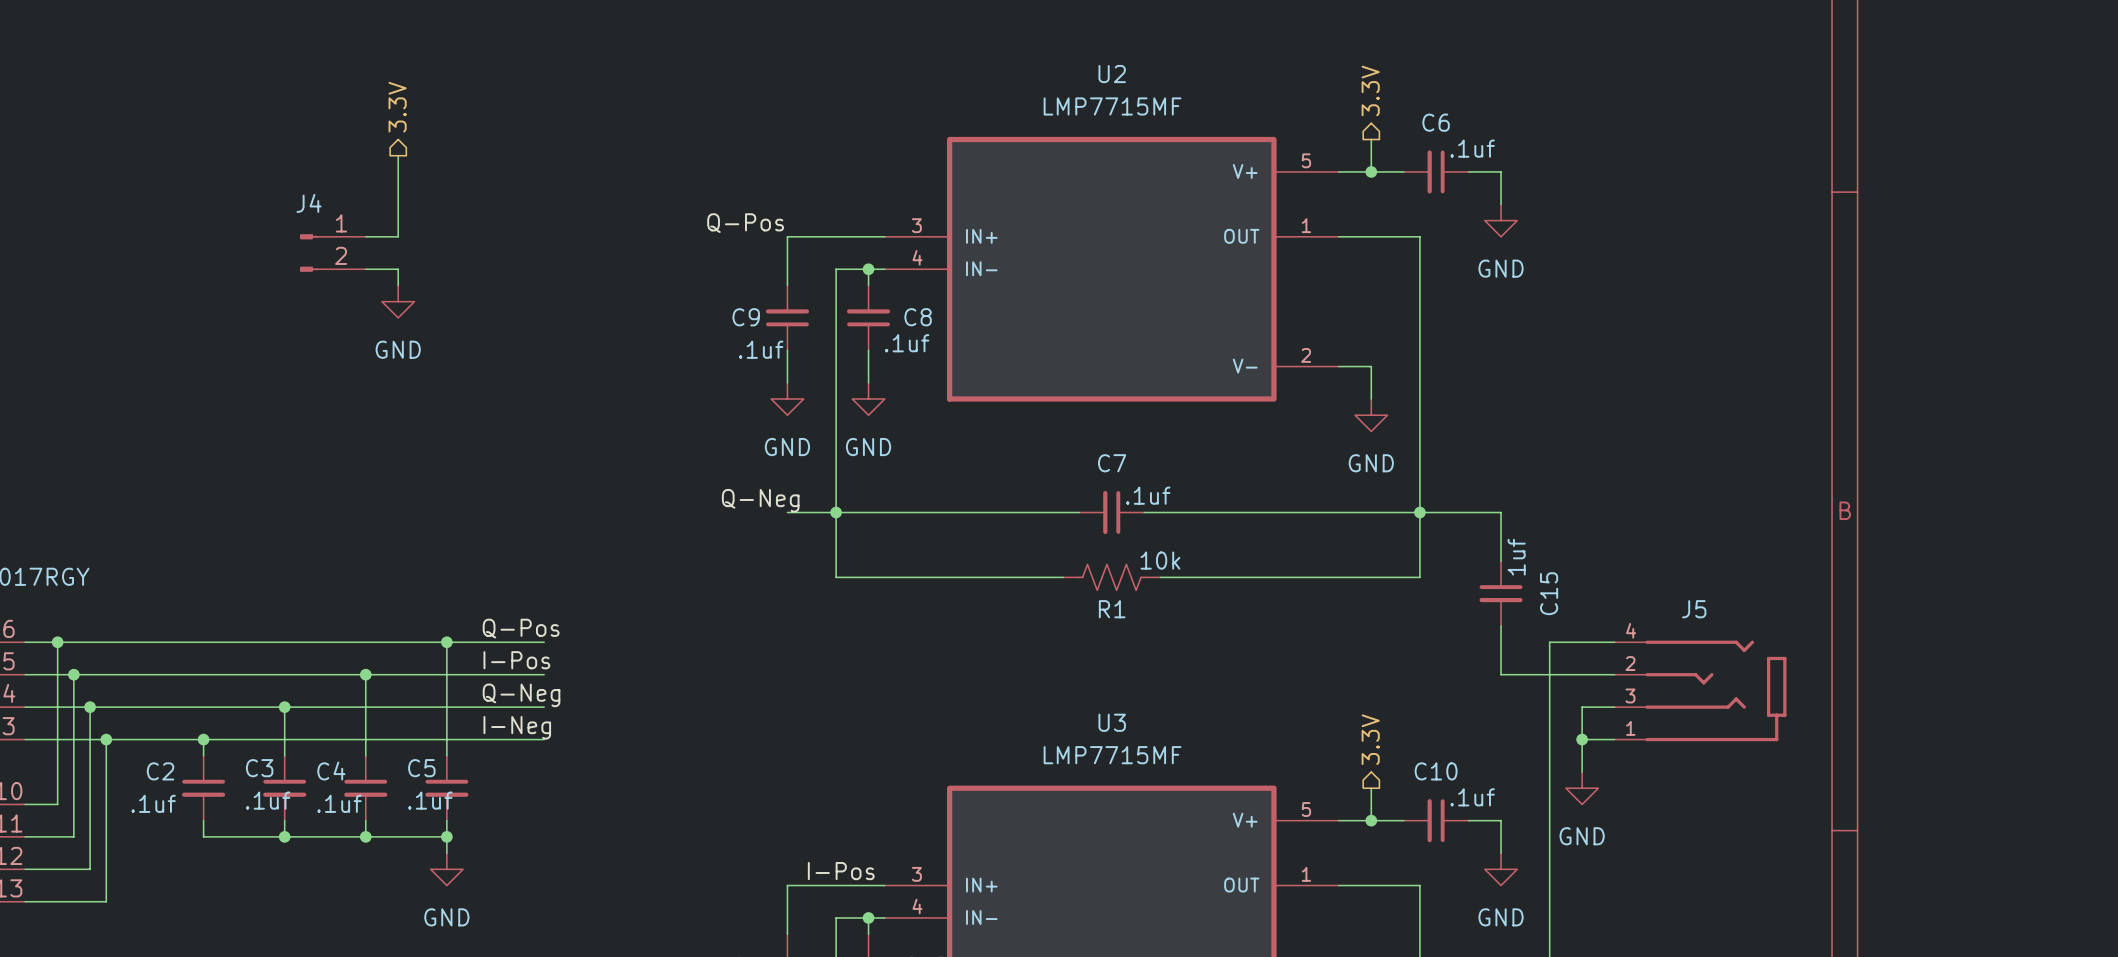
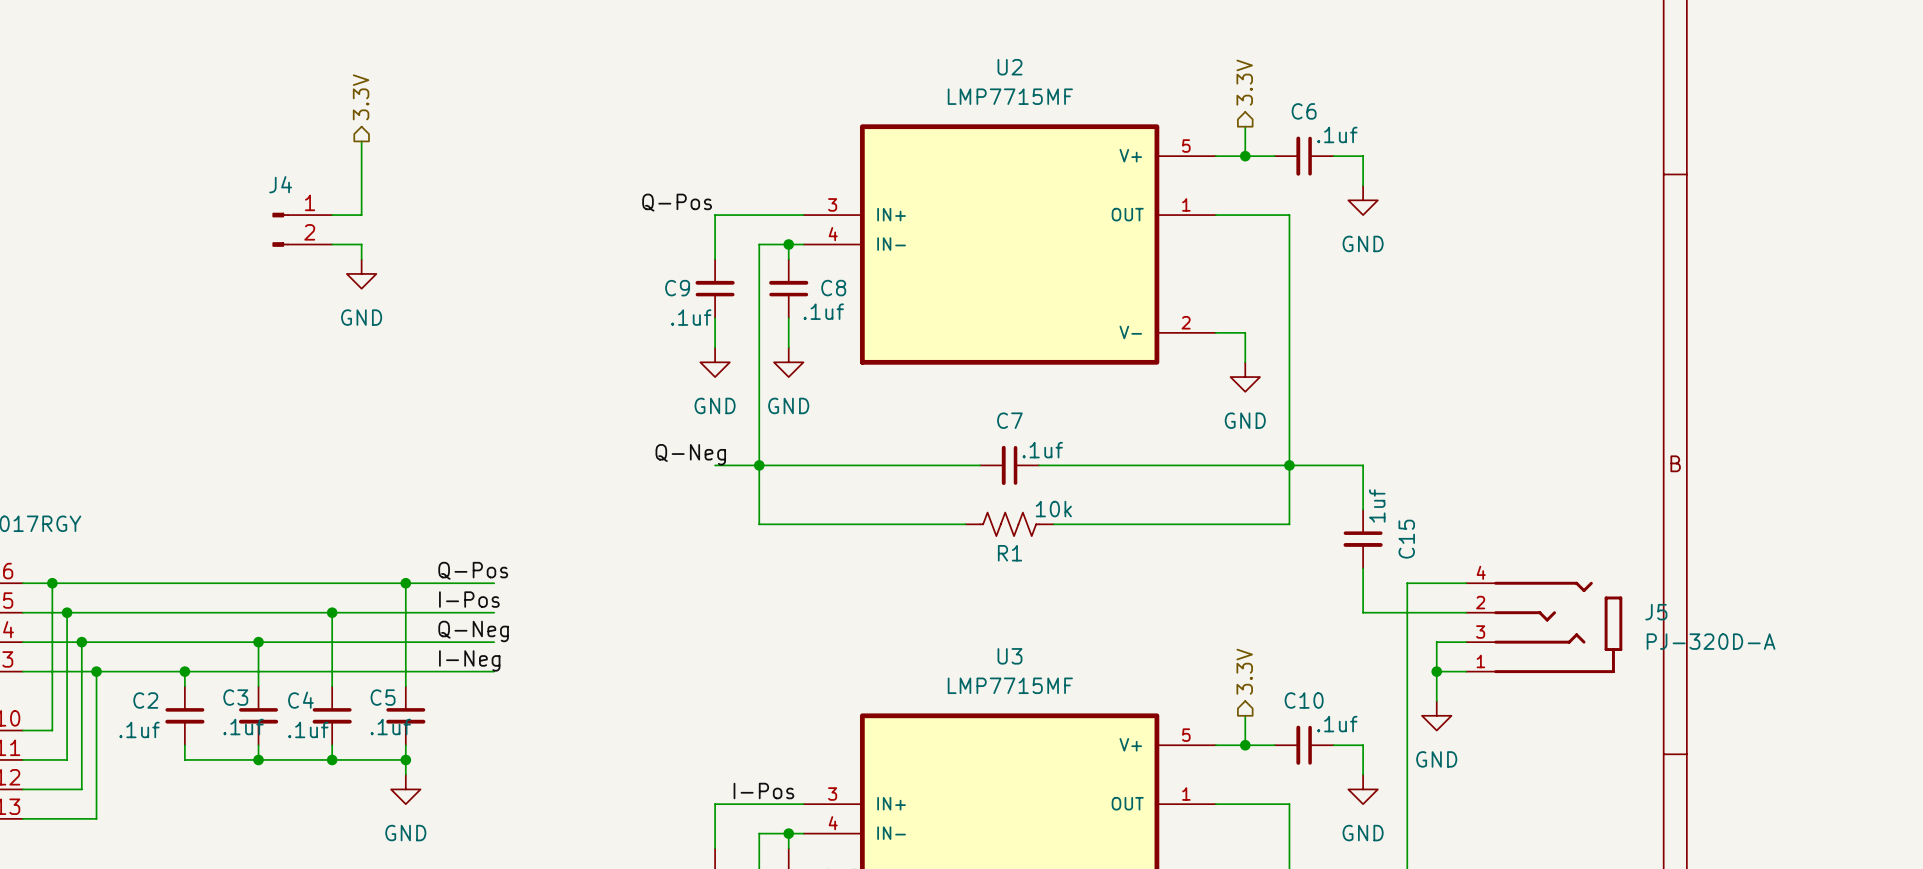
J5 name position: J5 (1694, 609) -> J5 (1656, 612)
J5 value: none -> PJ-320D-A (1711, 641)

